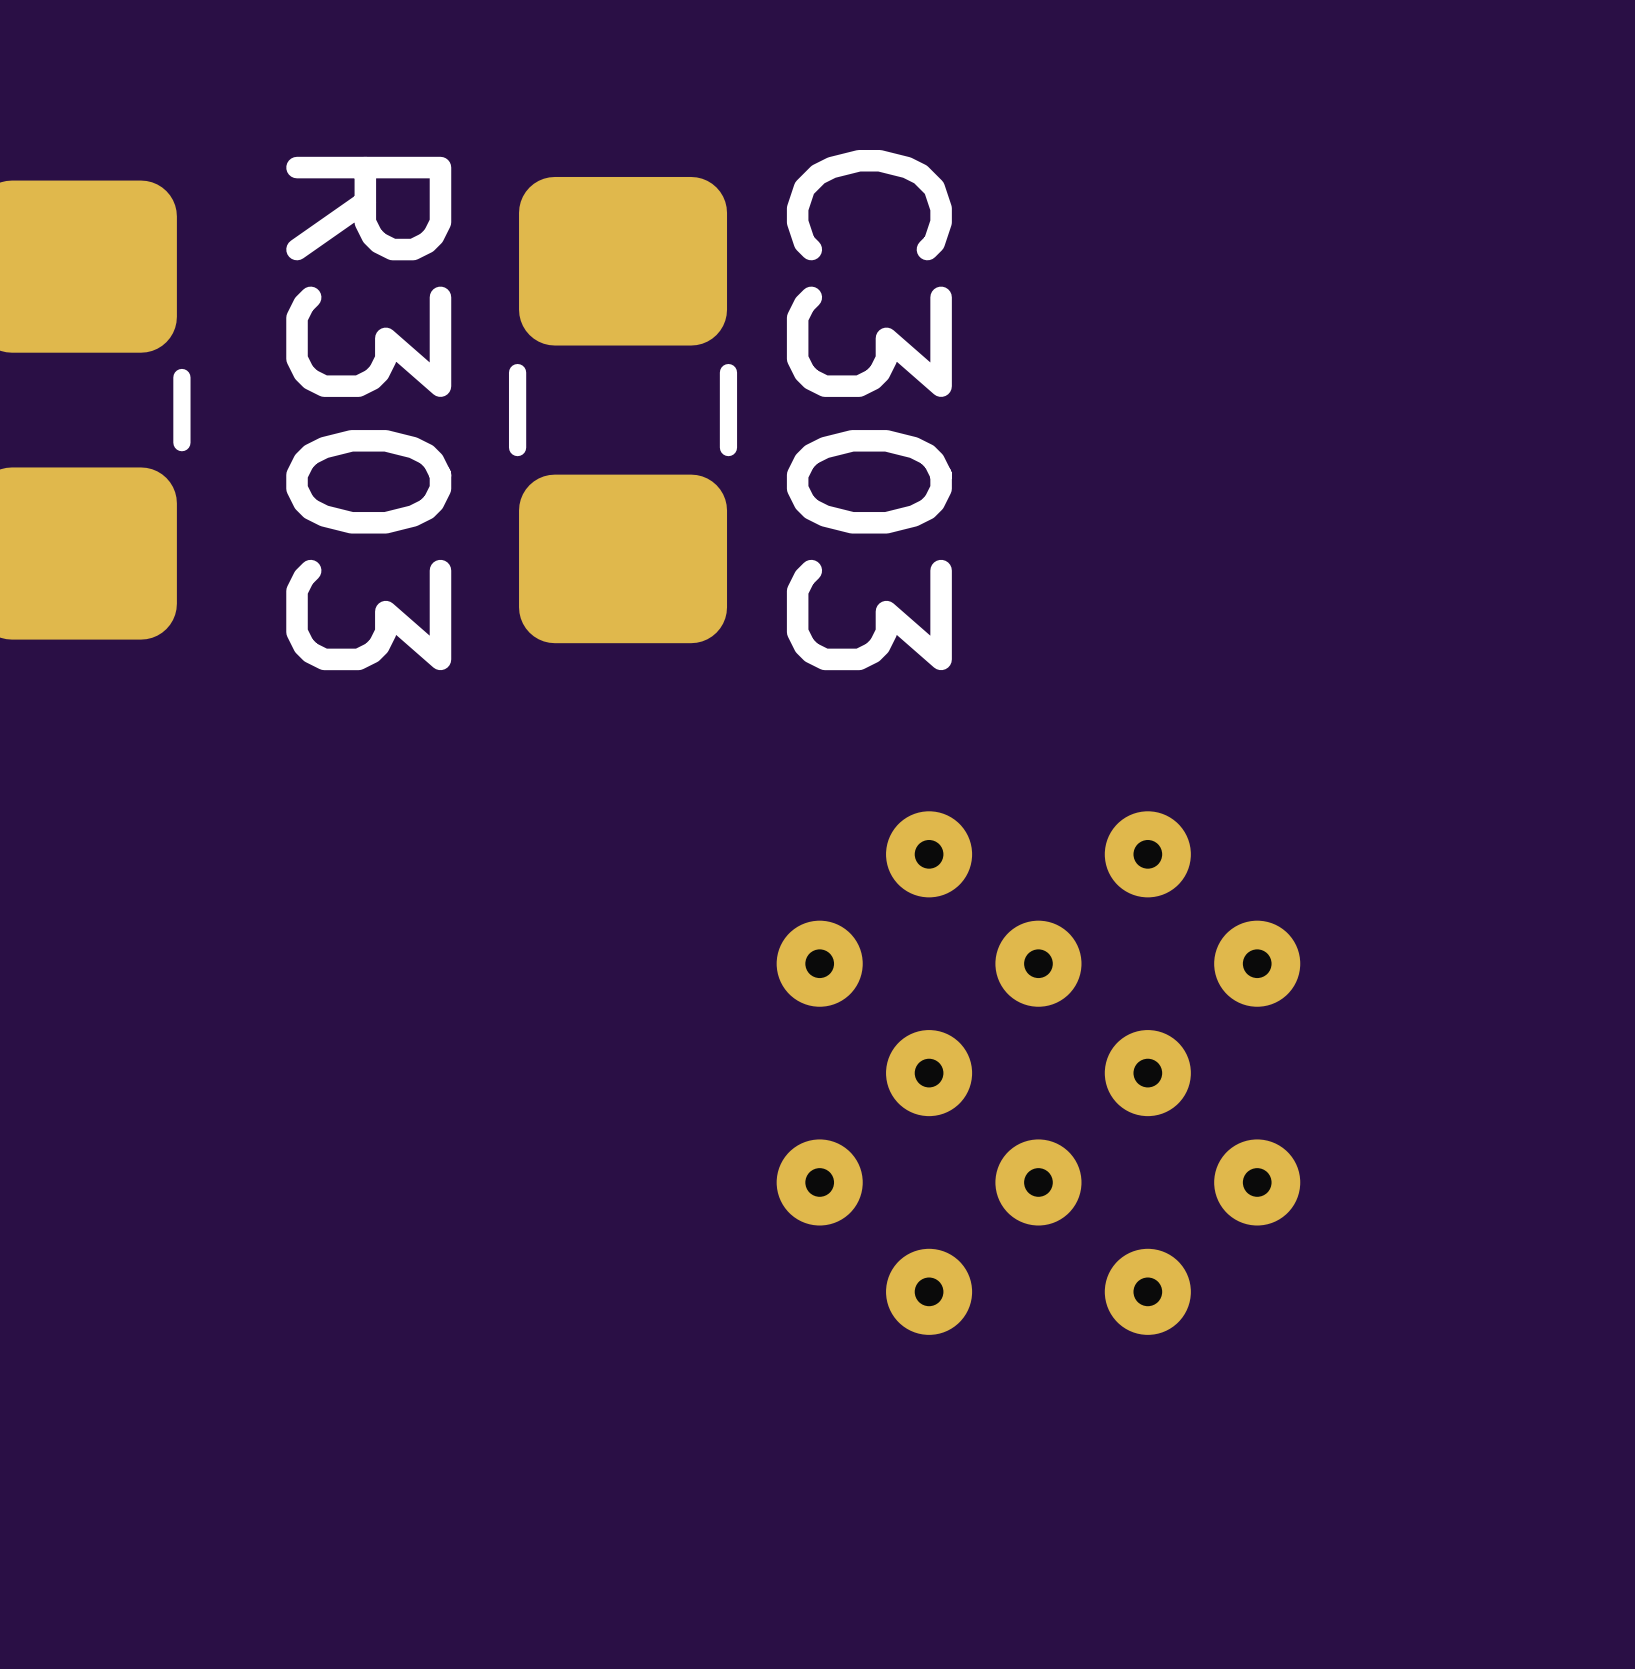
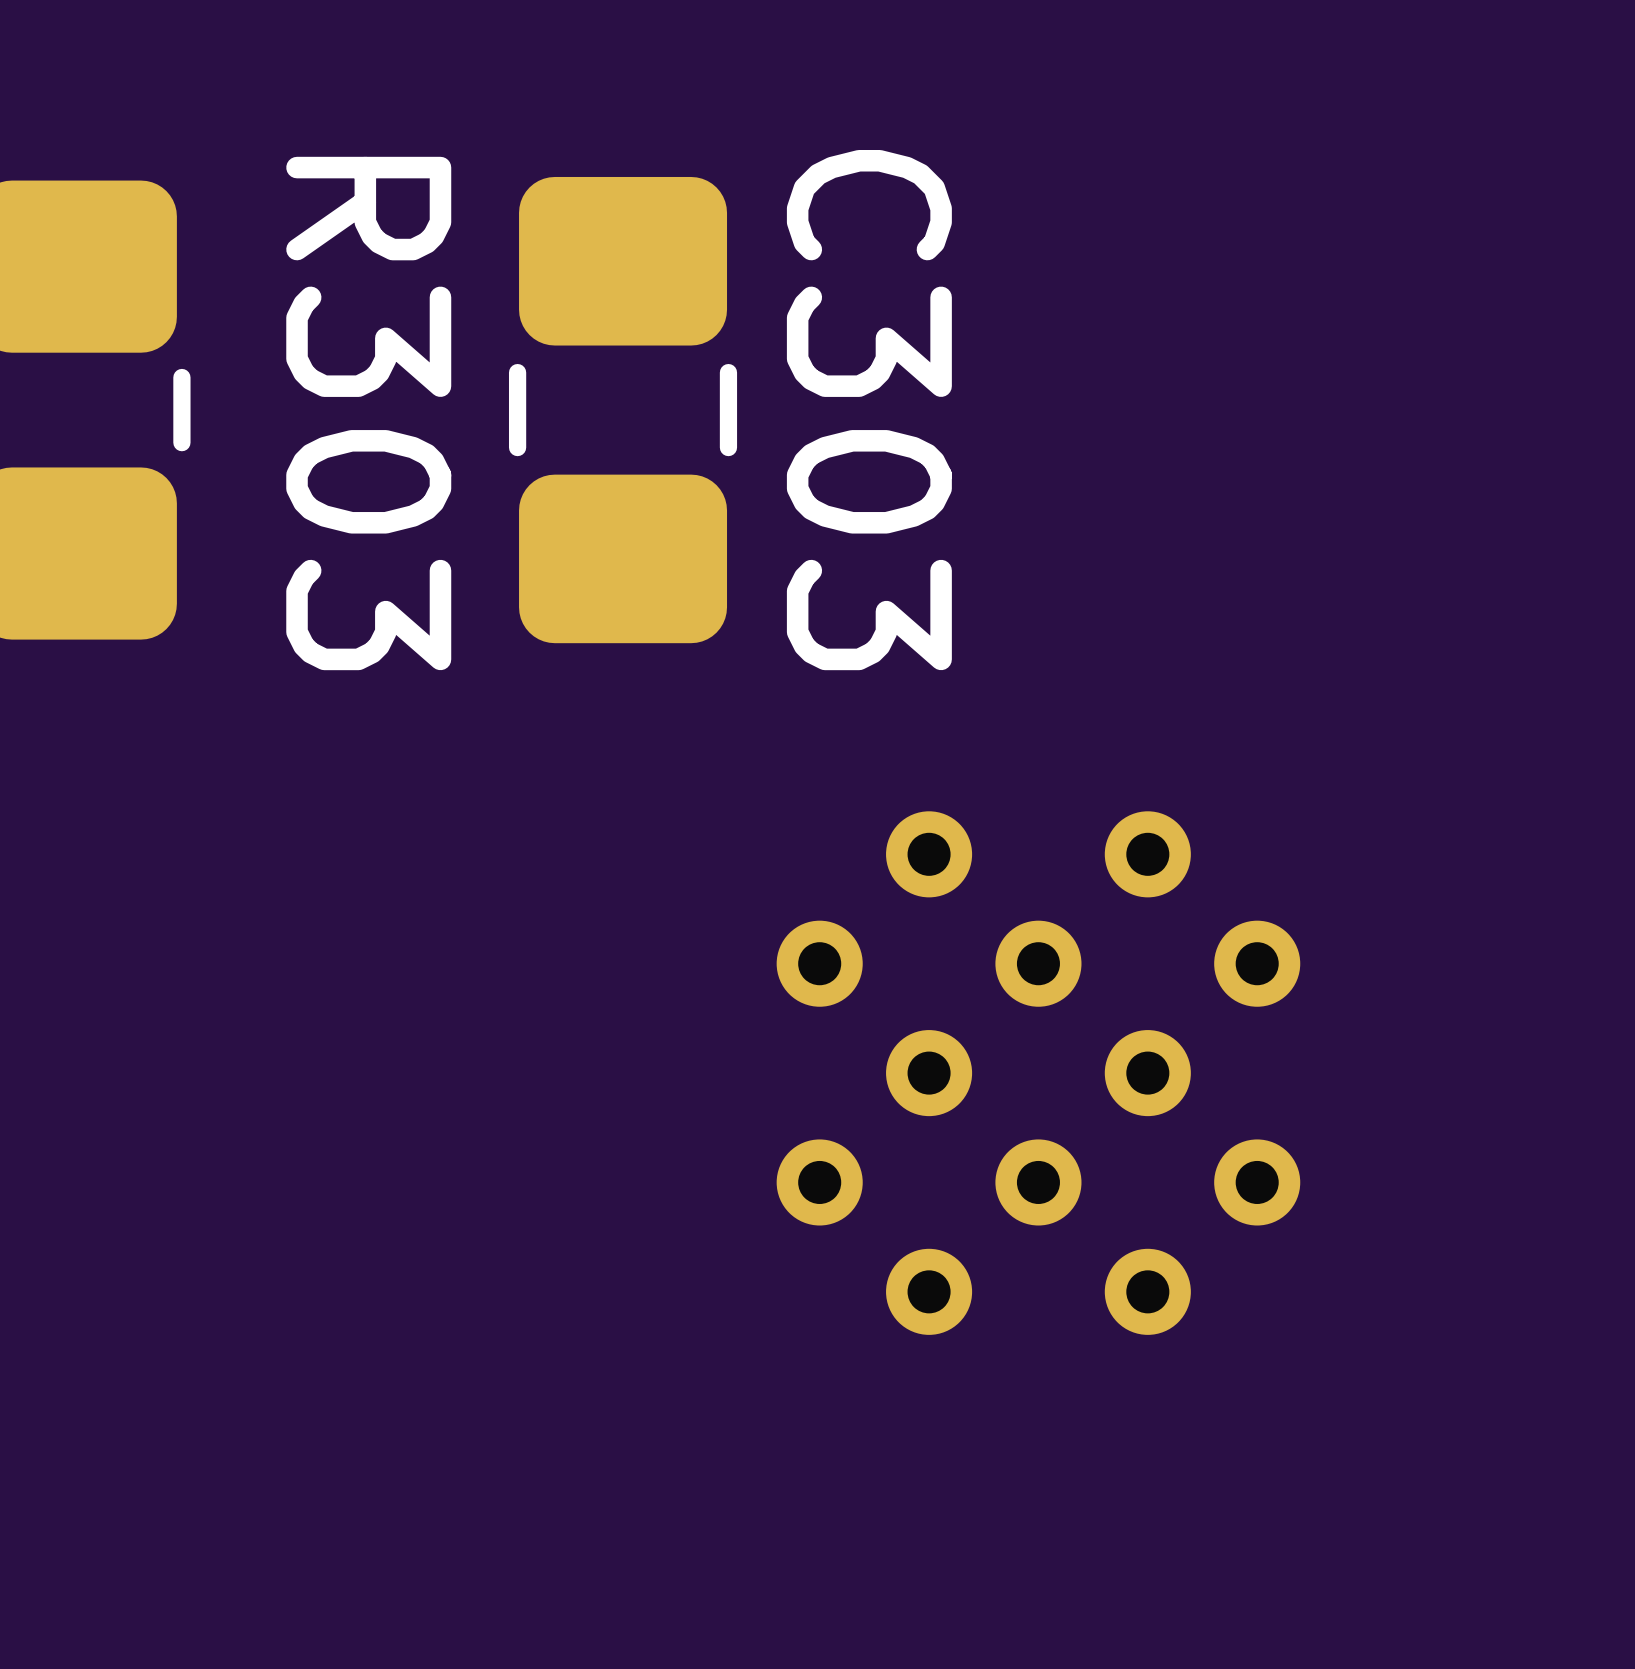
part footprint: [776, 811, 1301, 1335] -> [776, 811, 1301, 1335]

